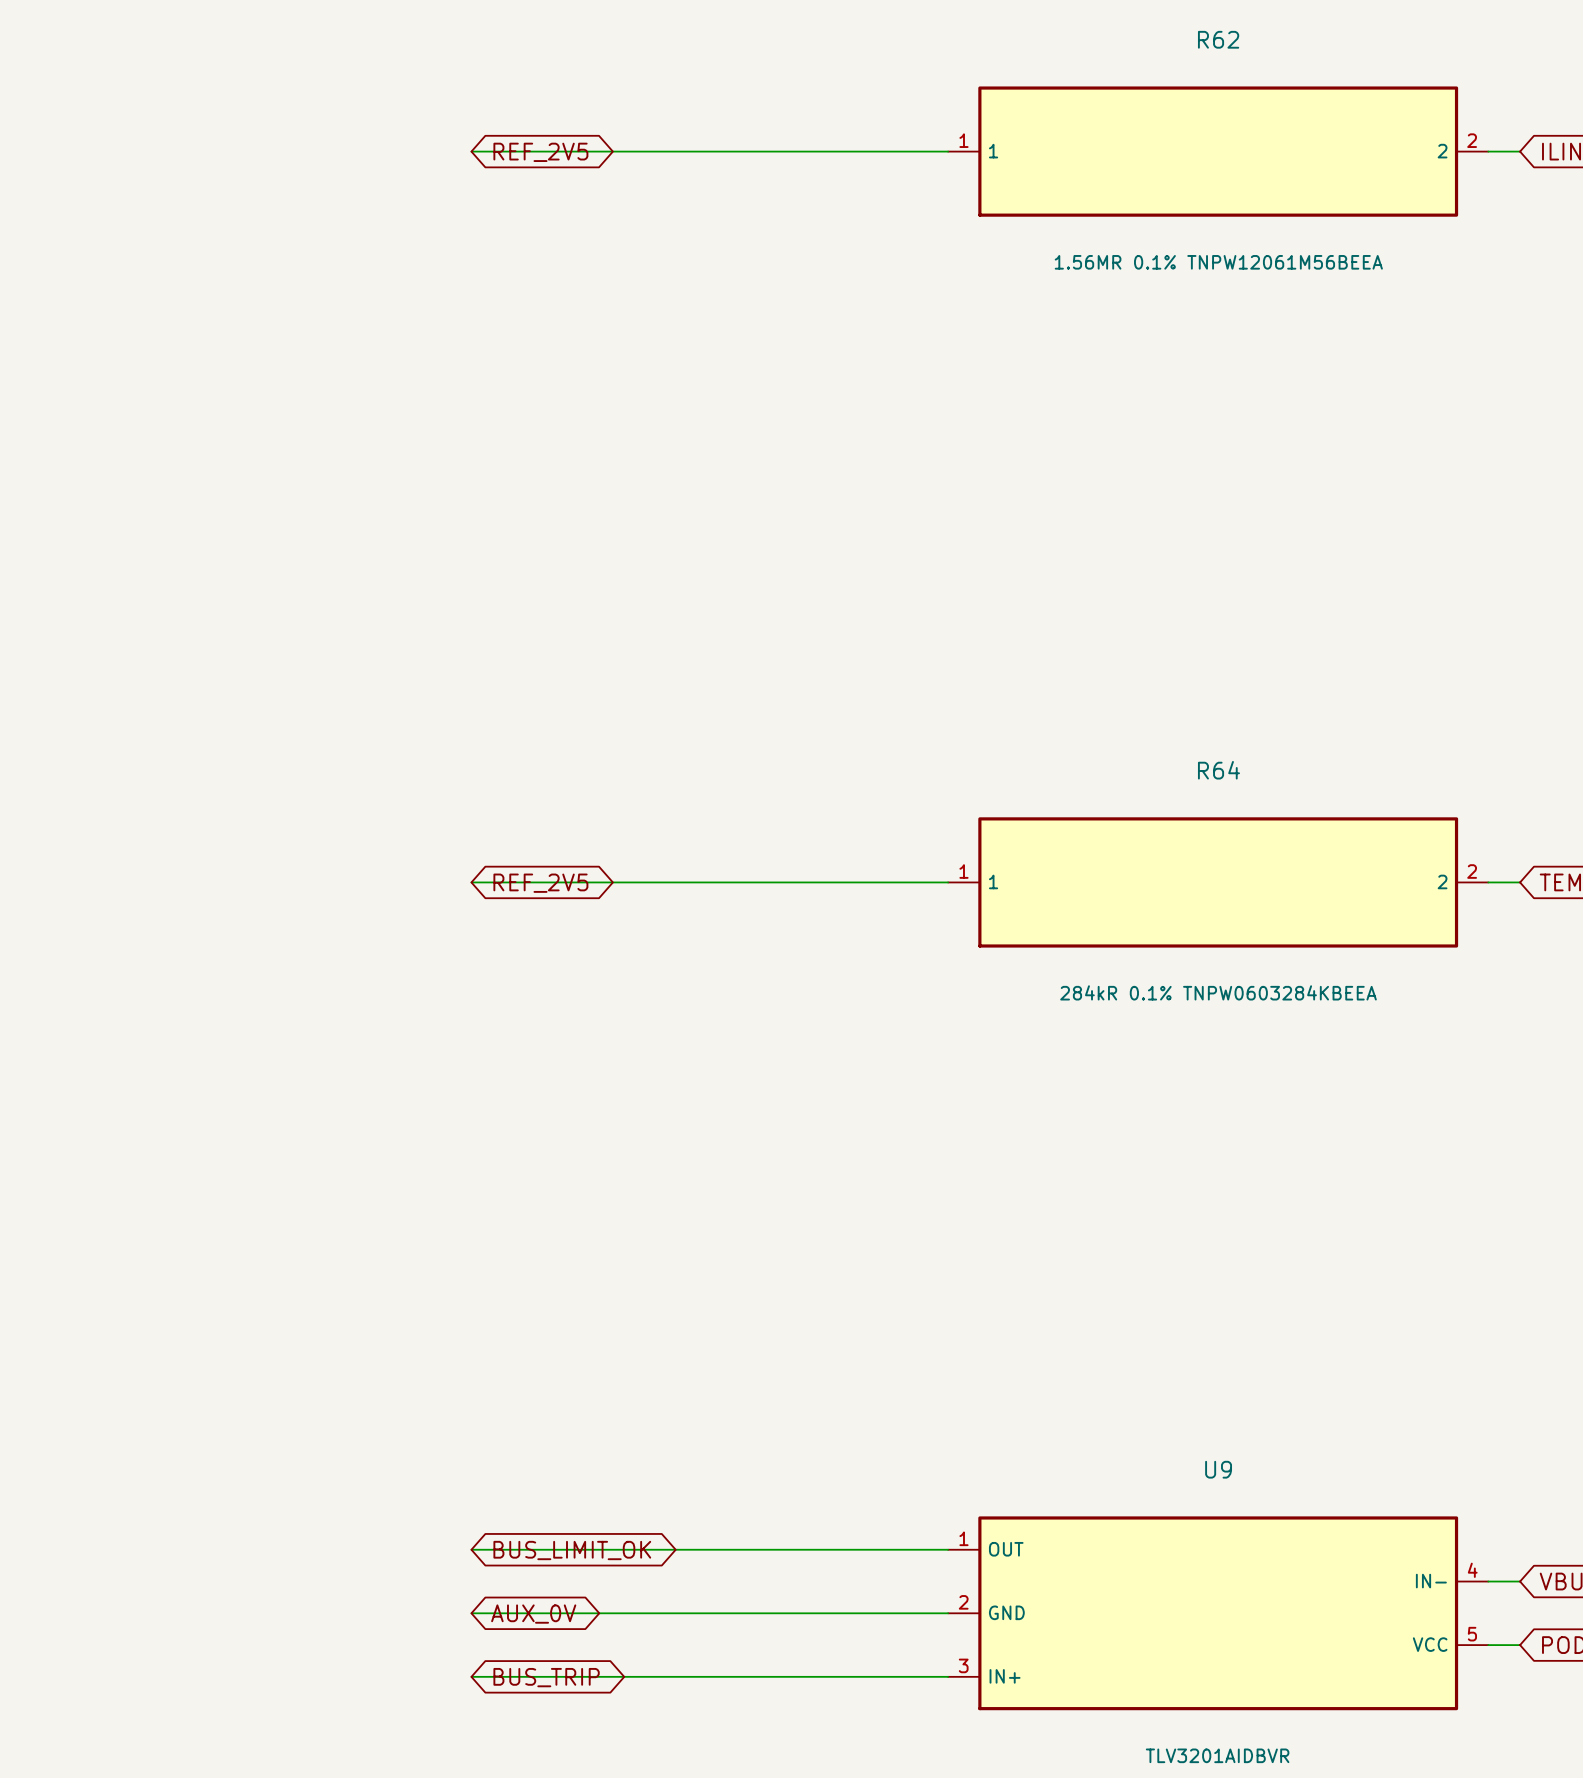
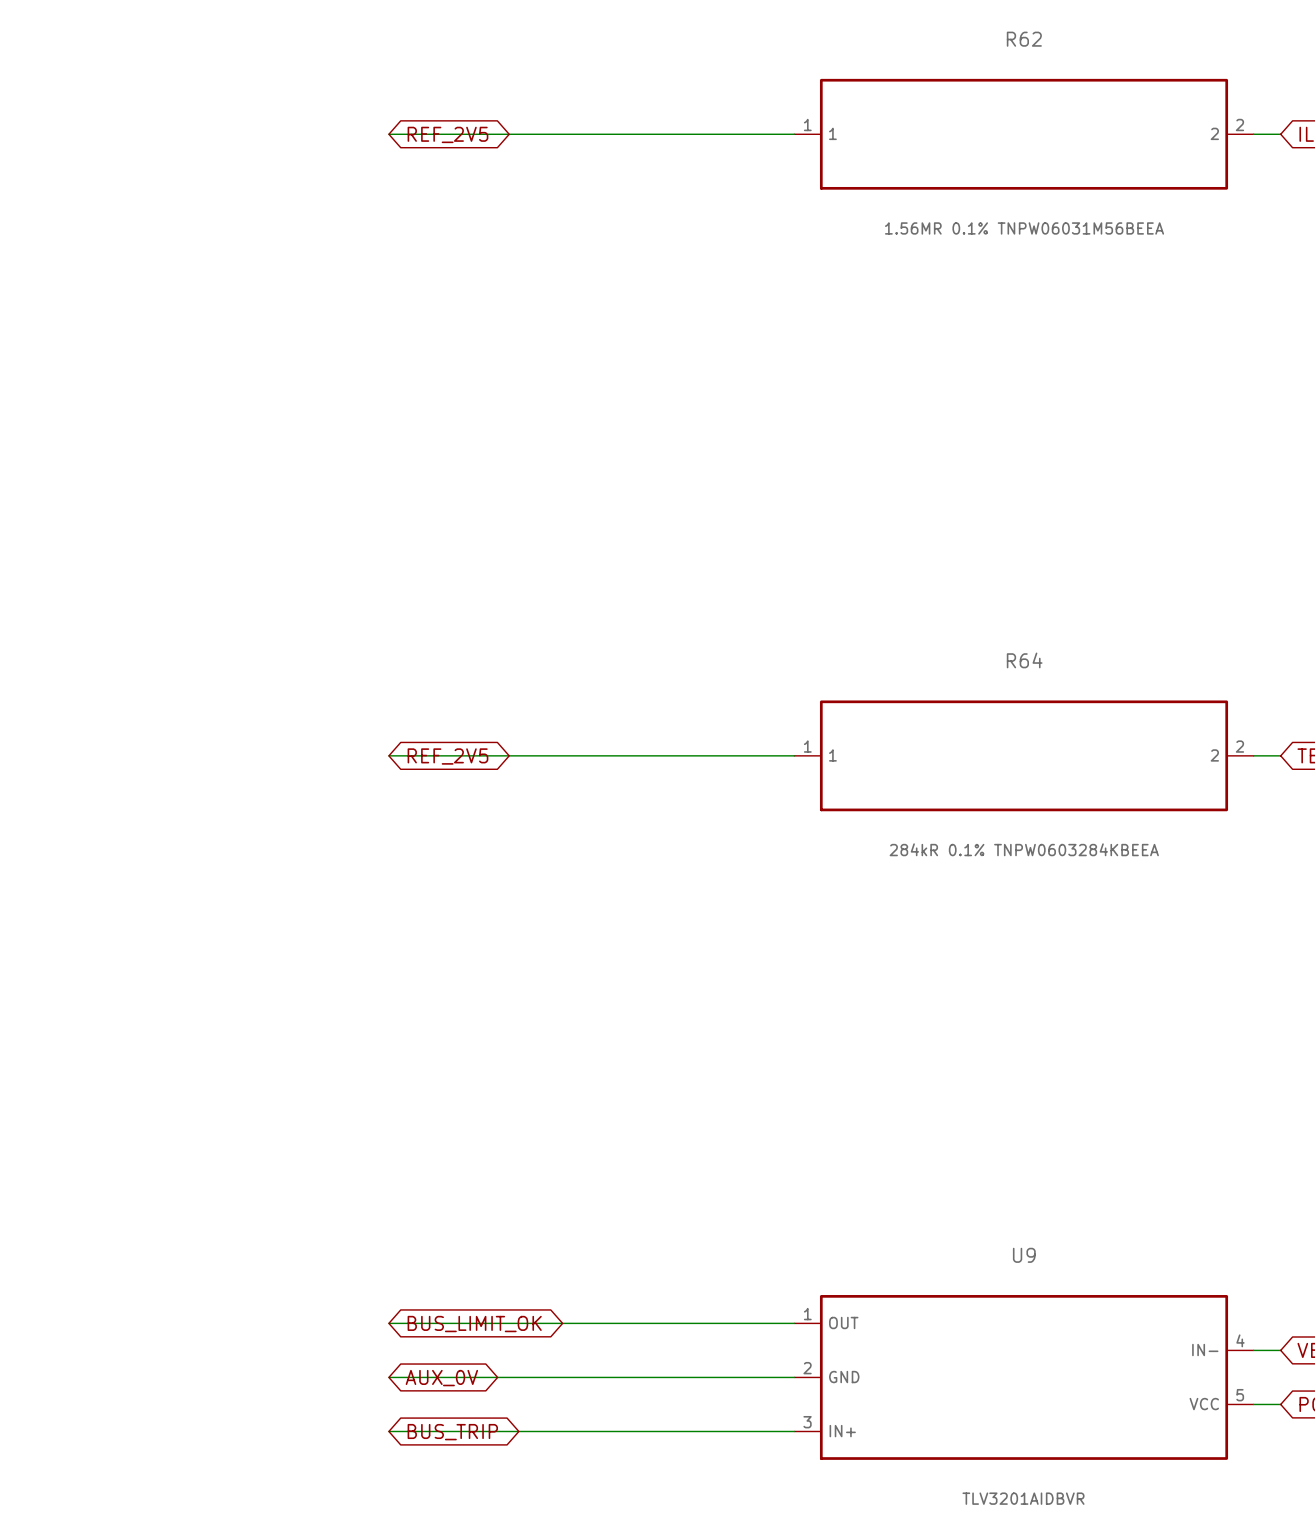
R62 value: 1.56MR 0.1% TNPW12061M56BEEA (1218, 262) -> 1.56MR 0.1% TNPW06031M56BEEA (1024, 228)

